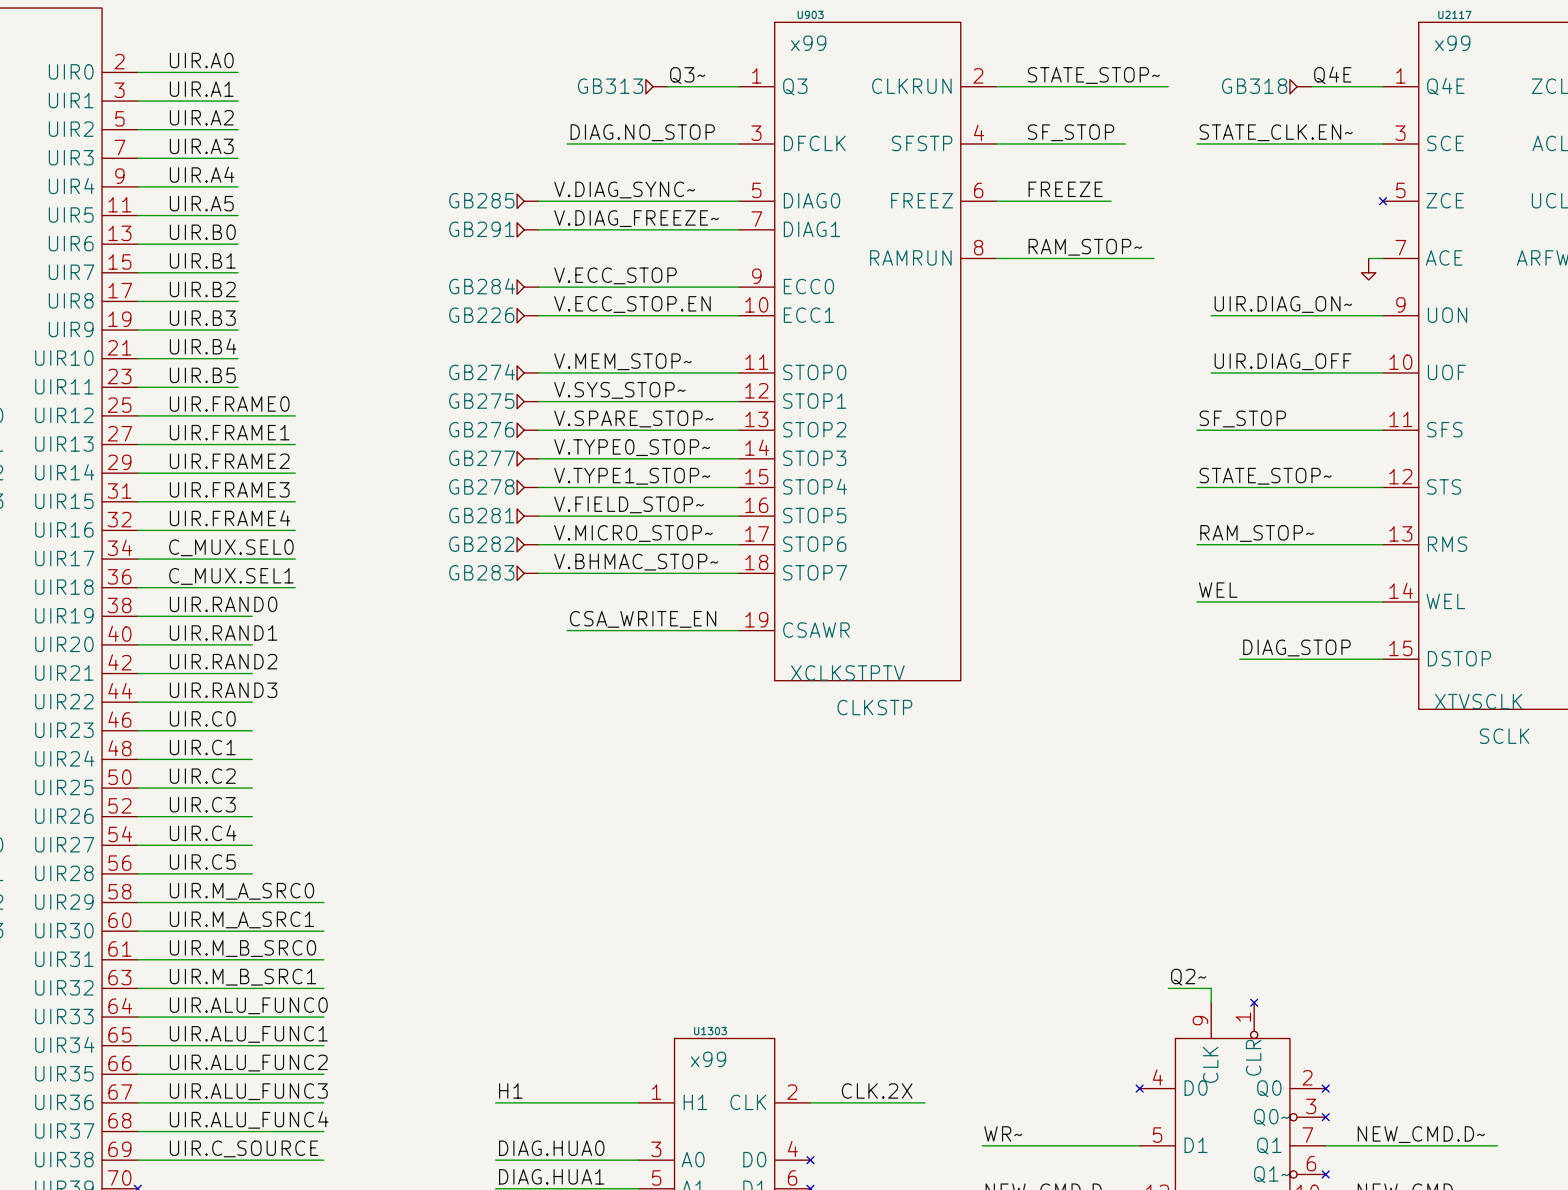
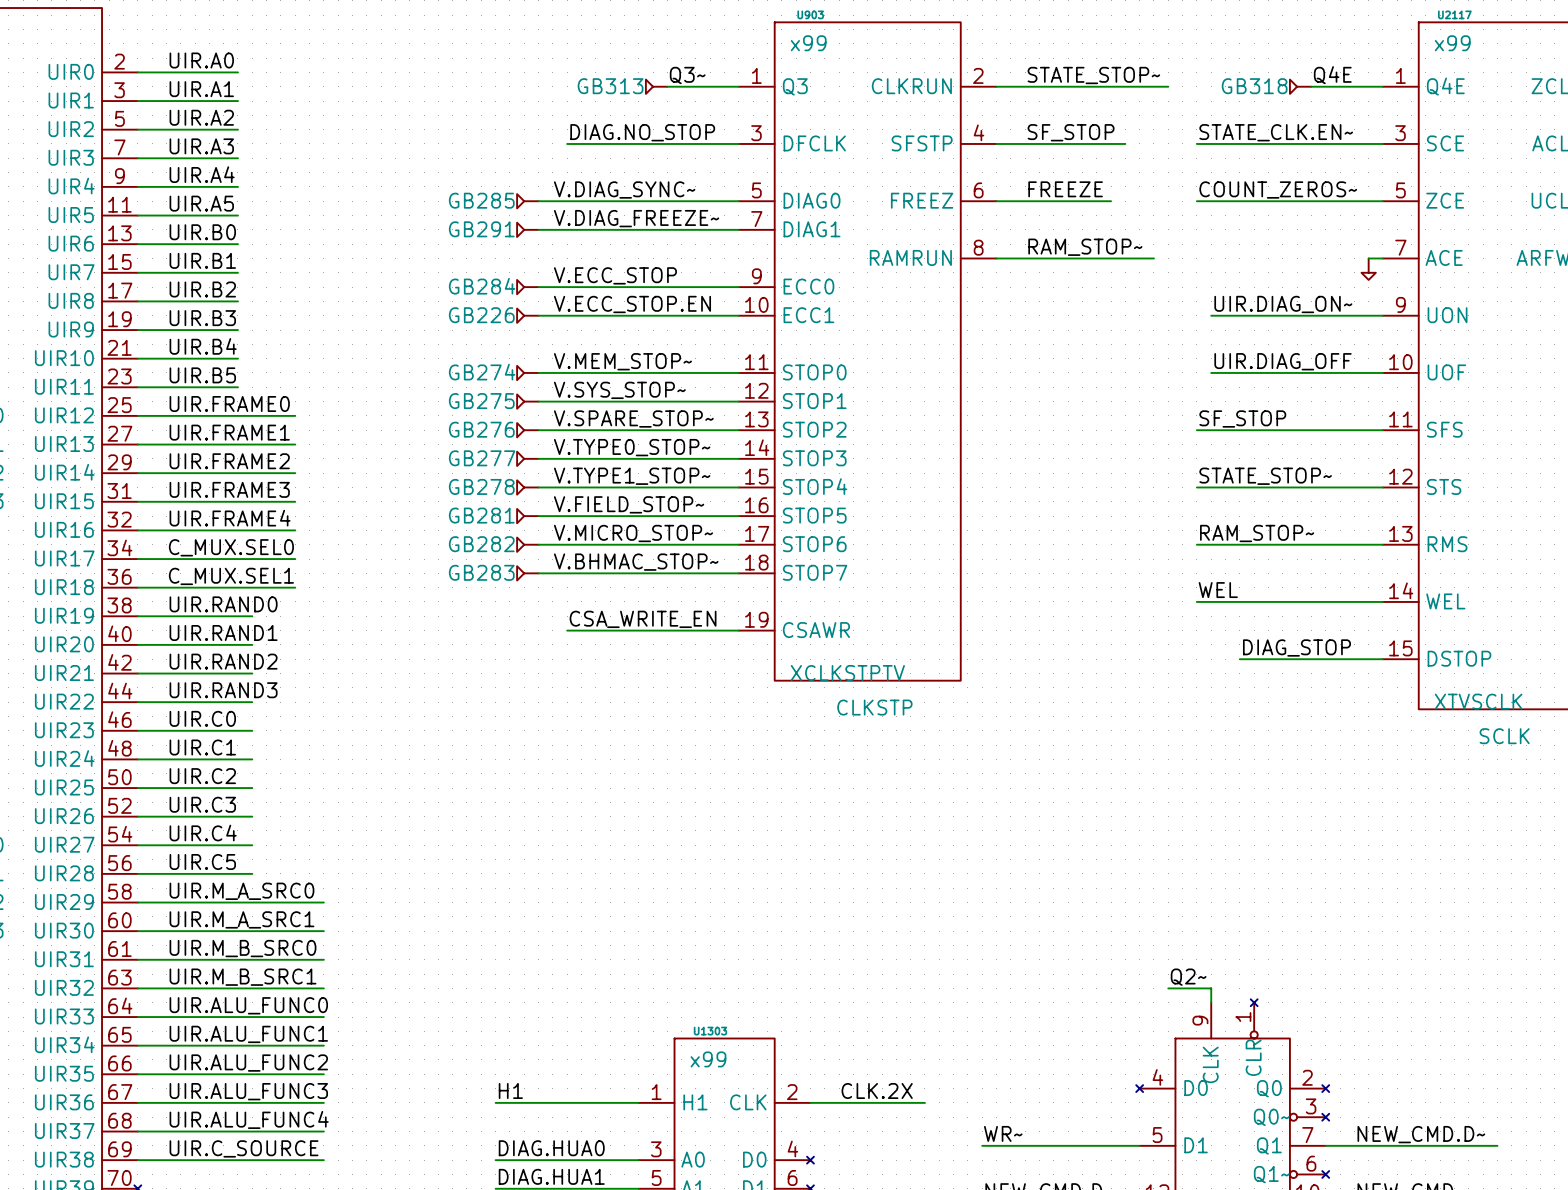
label: none -> COUNT_ZEROS~ (1278, 190)
wire: none -> (1196, 201) (1382, 201)
no-connect mark: (1382, 201) -> none

